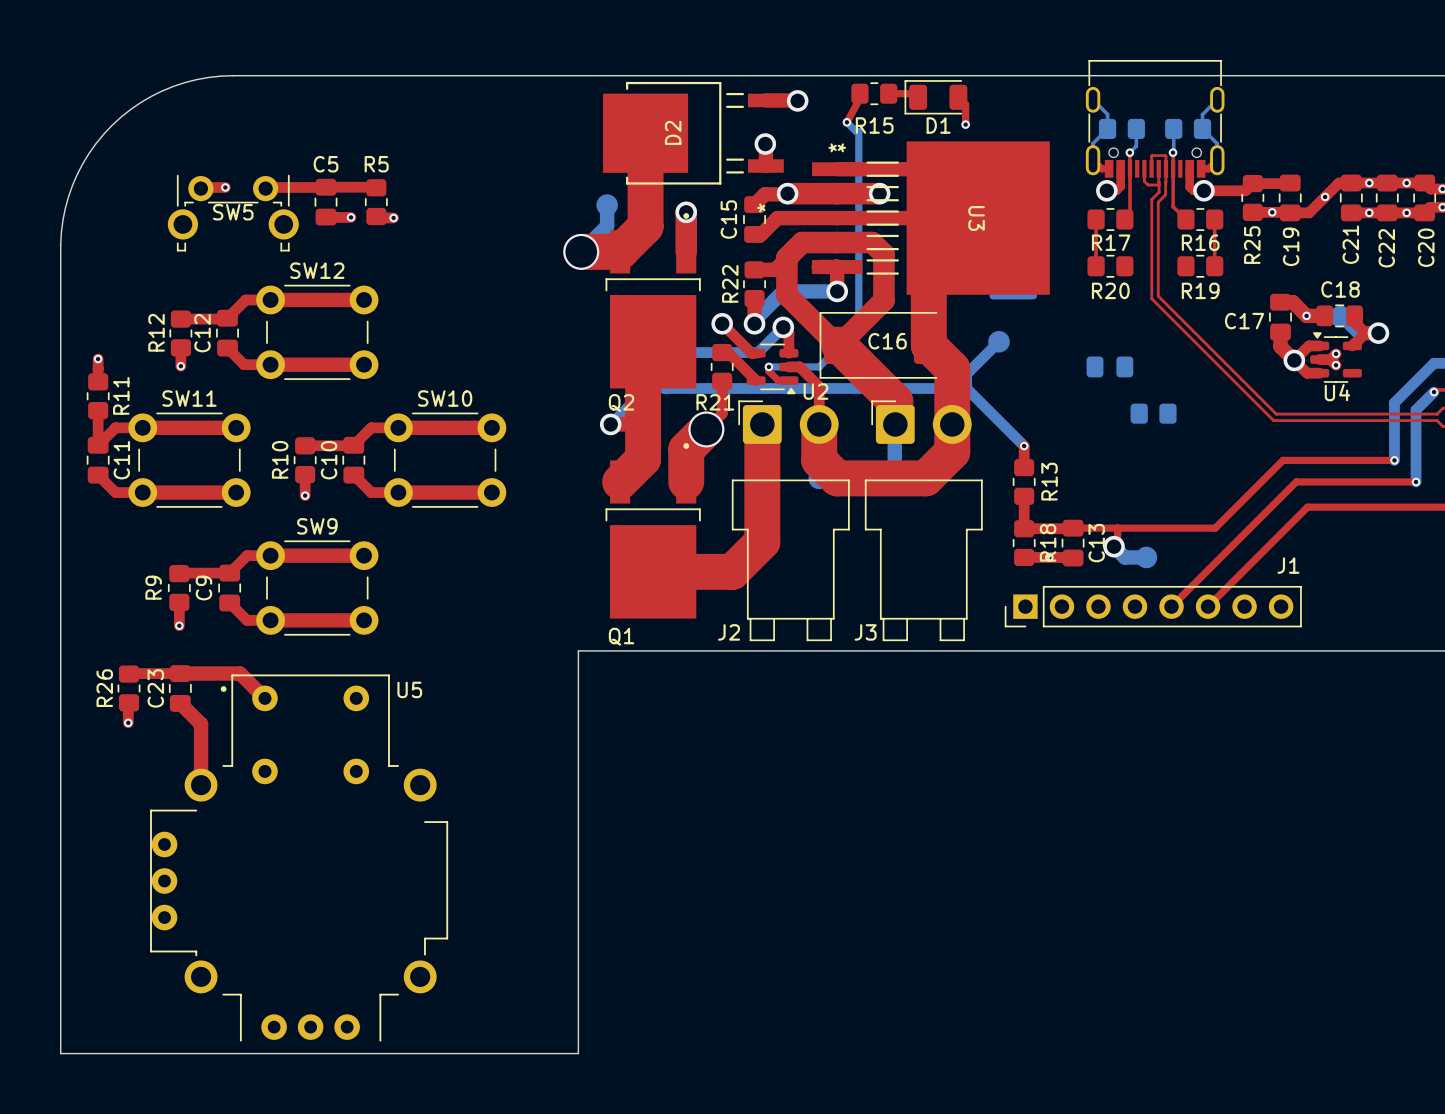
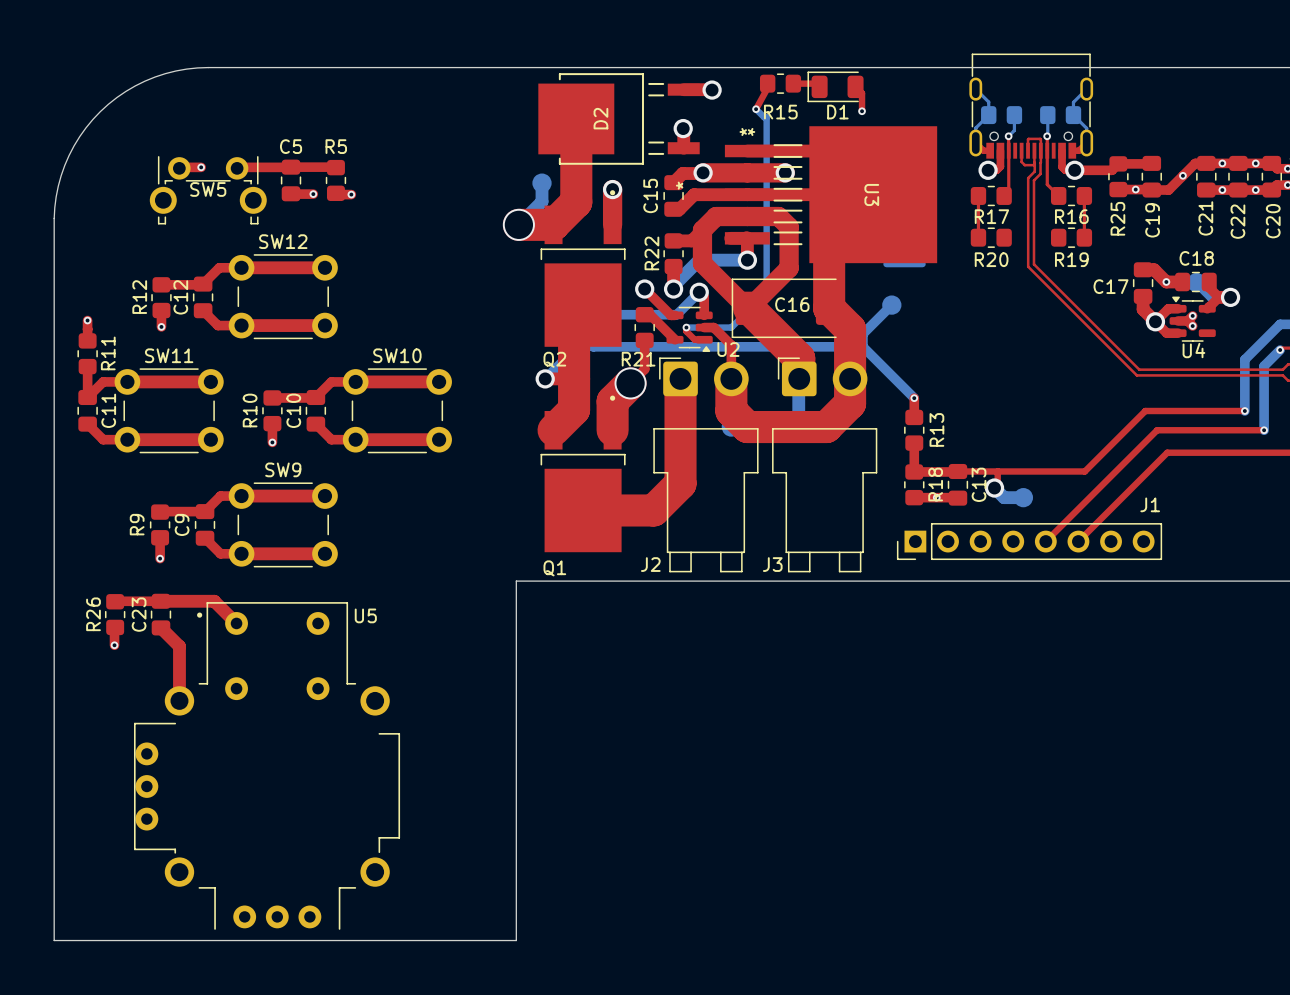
part: (1109, 366) -> none
part: (1153, 413) -> none

